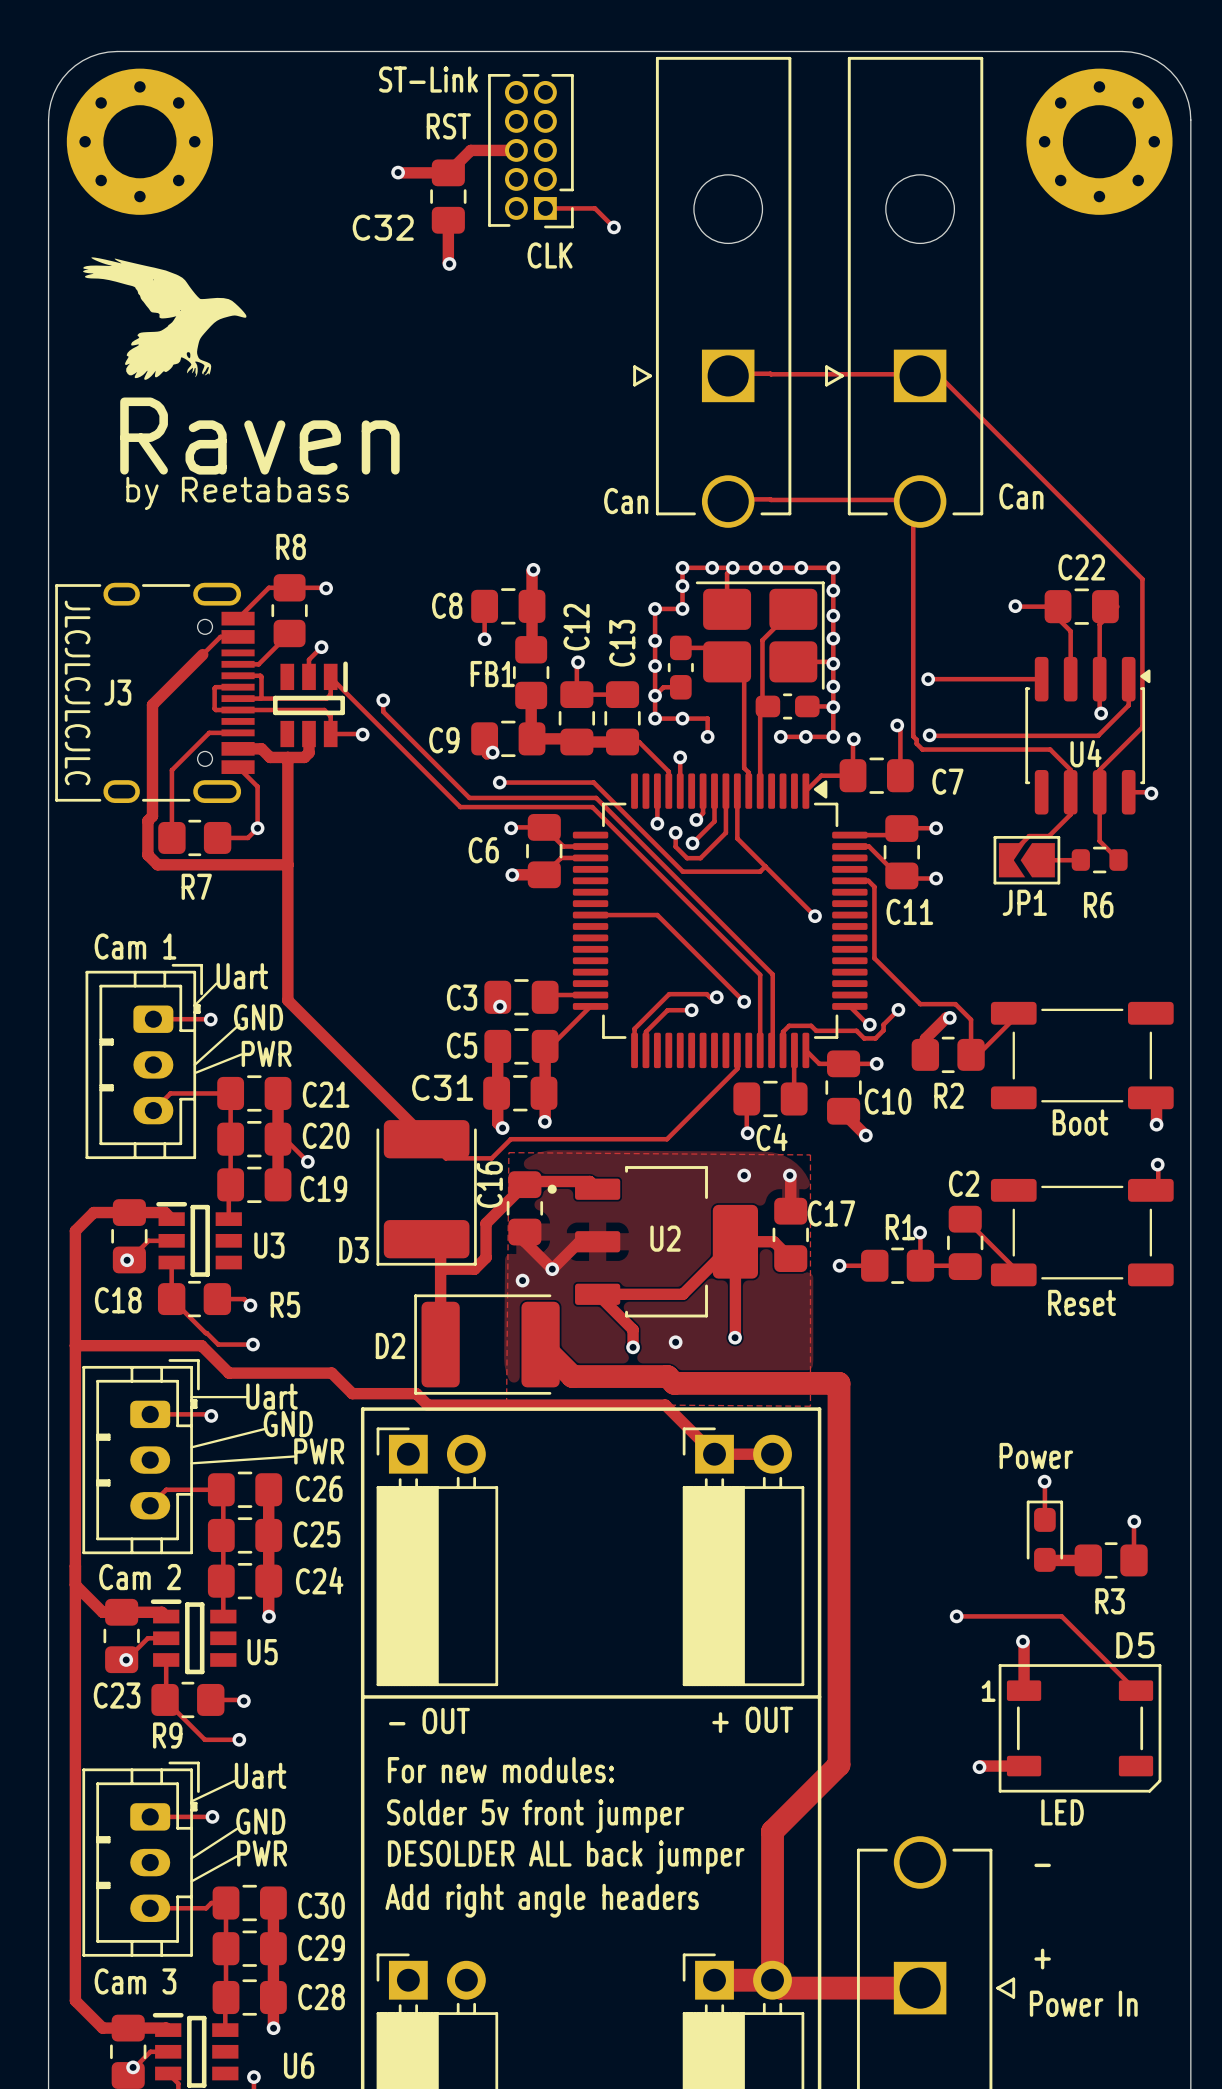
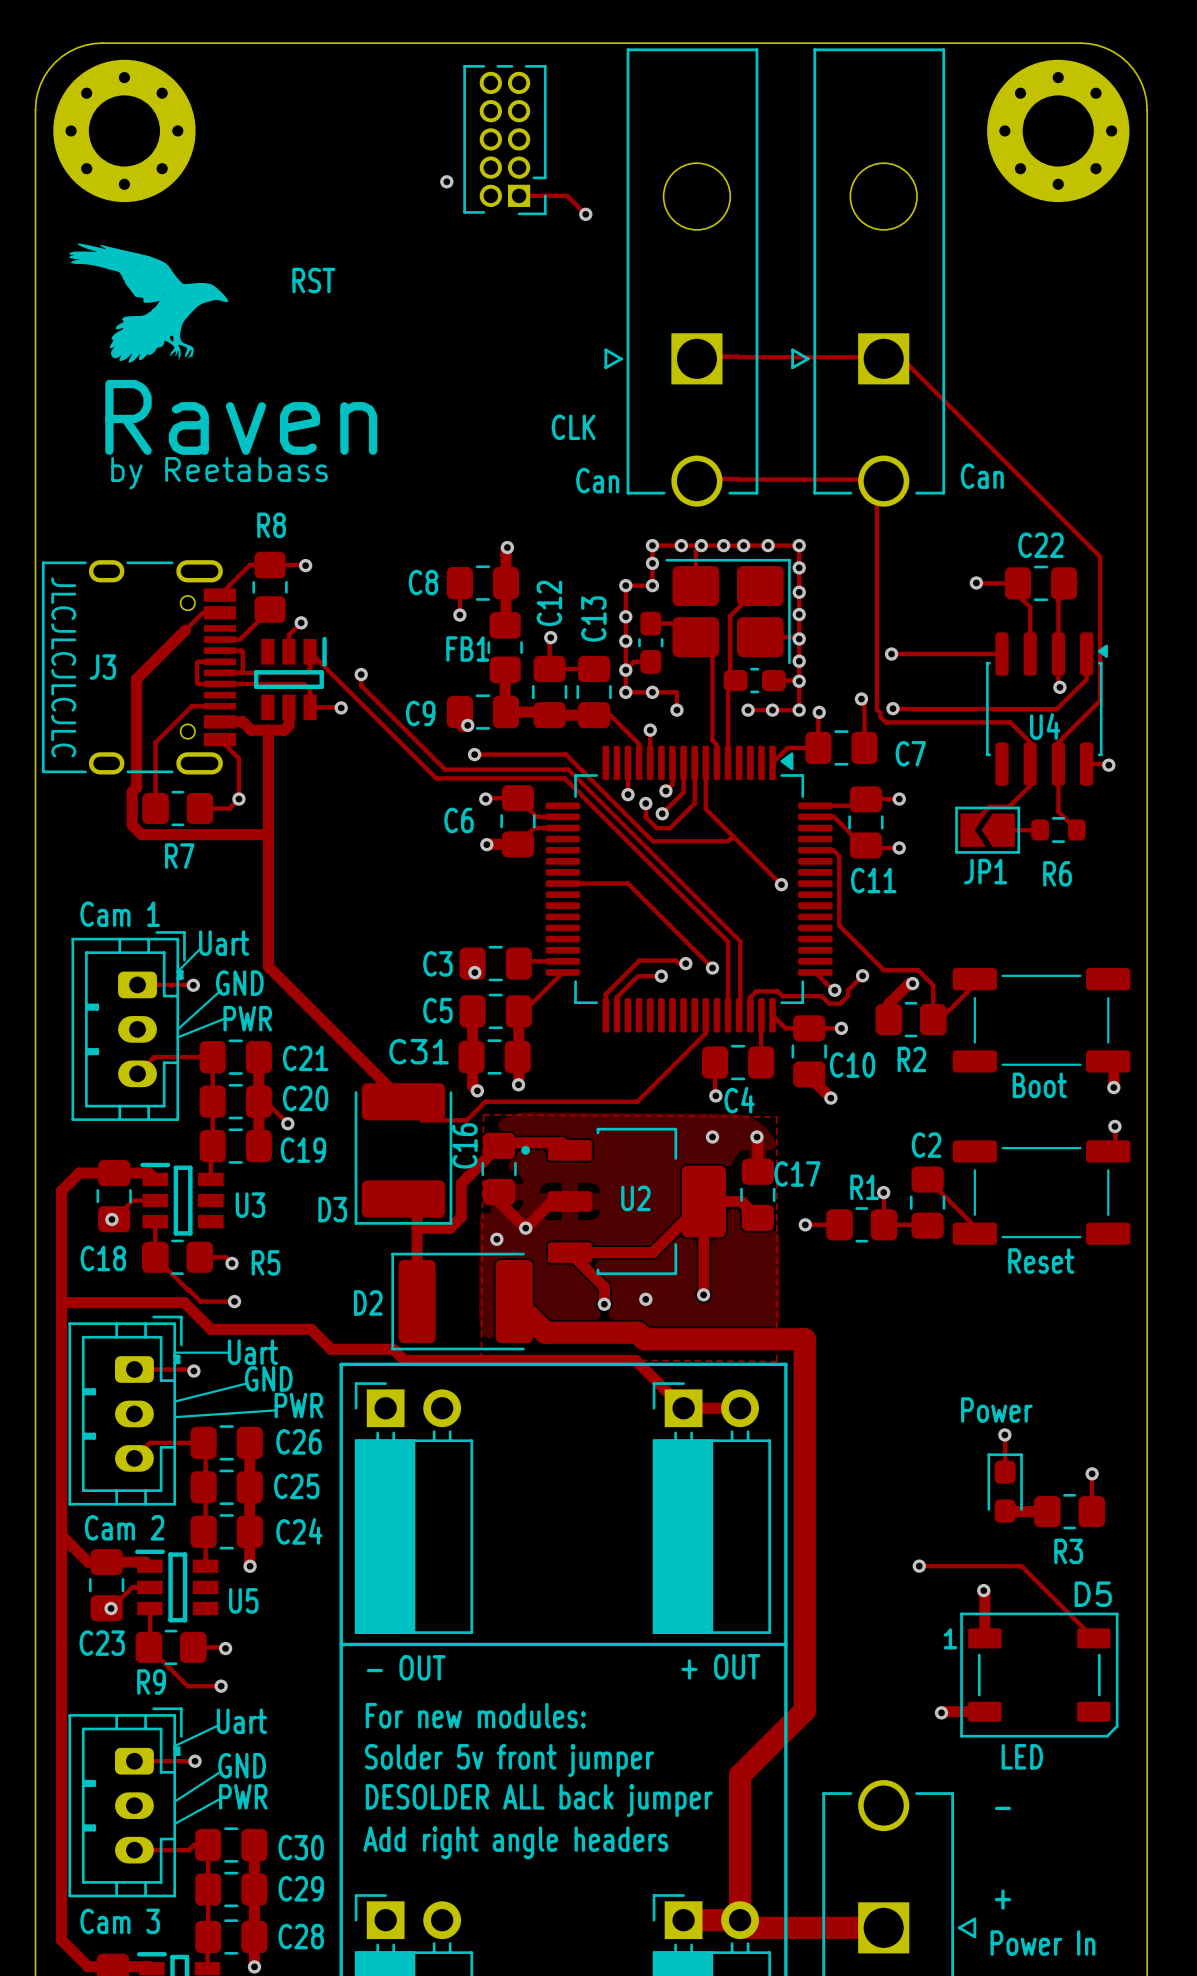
text: ST-Link (428, 79) -> none
text position: RST (448, 126) -> RST (313, 280)
track: (516, 150) (470, 150) (448, 172) (398, 172) -> none
via: (398, 172) -> none
via: none -> (446, 181)
C32: (448, 196) -> none
track: (448, 220) (449, 263) -> none
text position: CLK (550, 255) -> CLK (573, 427)
via: (449, 263) -> none

